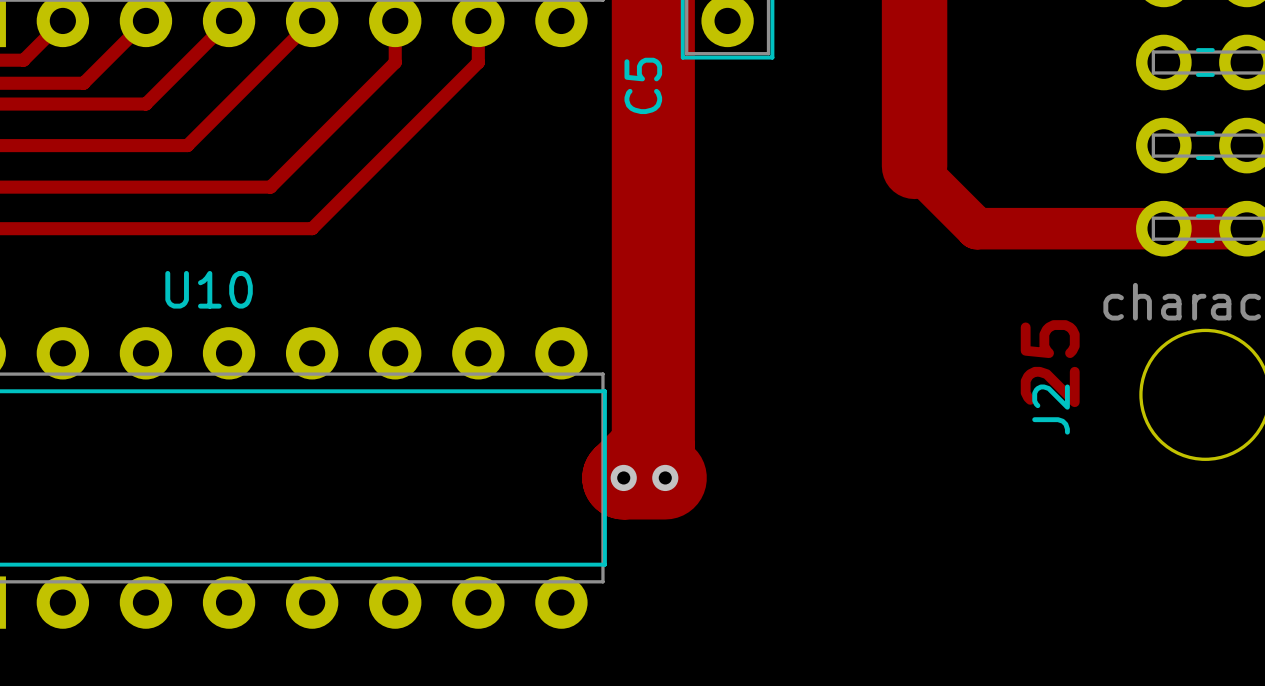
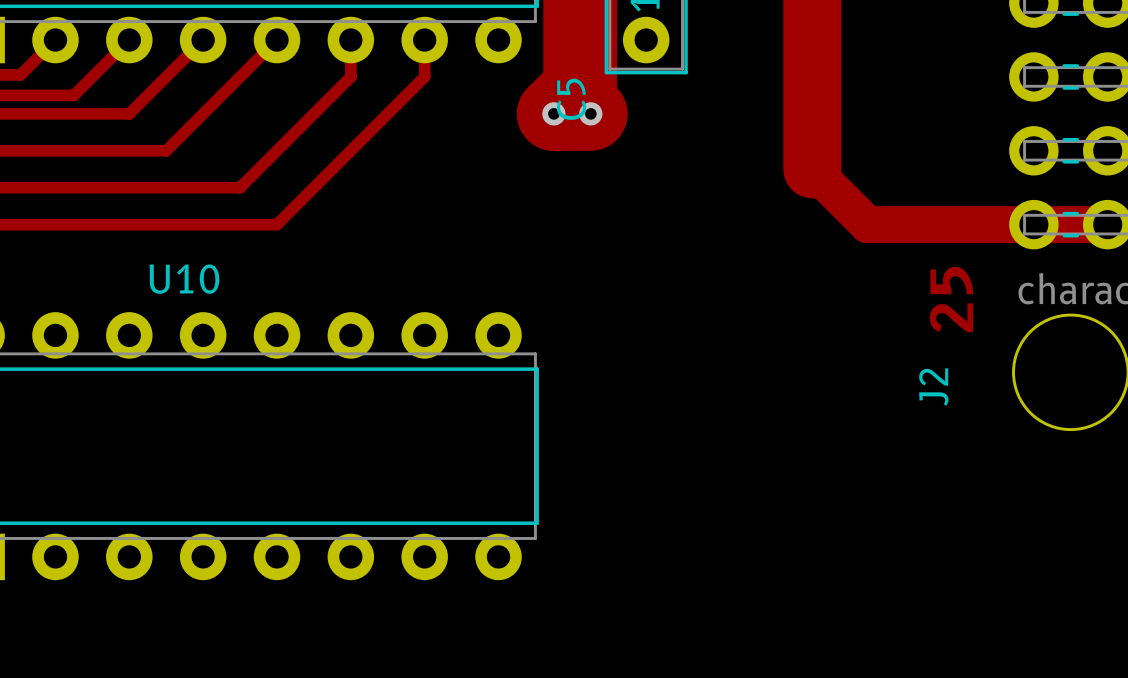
track: (653, 74) (653, 448) (623, 477) (665, 477) -> (580, 87) (553, 113) (590, 113)
via: none -> (553, 113)
via: none -> (590, 113)
text position: 25 (1050, 363) -> 25 (951, 299)
via: (623, 477) -> none
via: (665, 477) -> none

